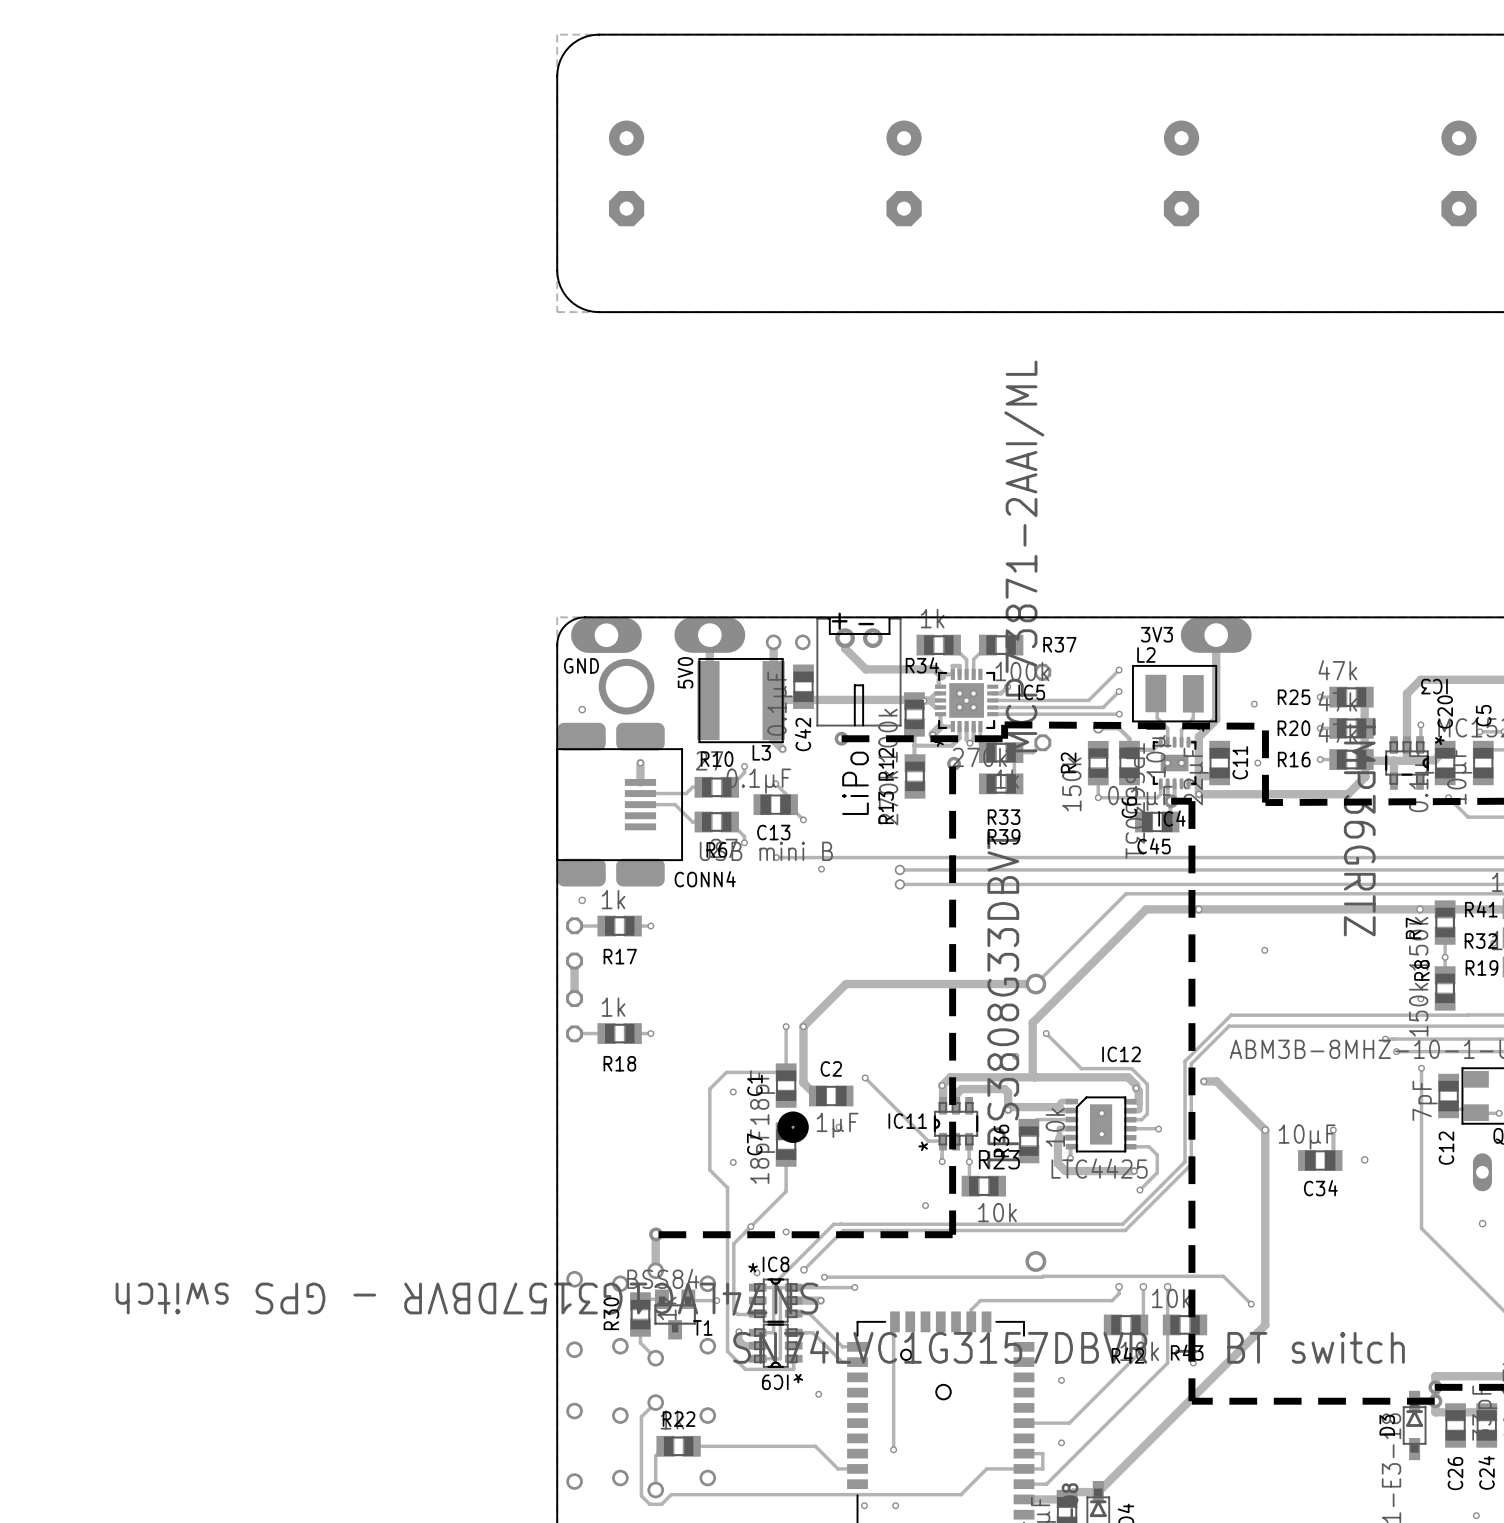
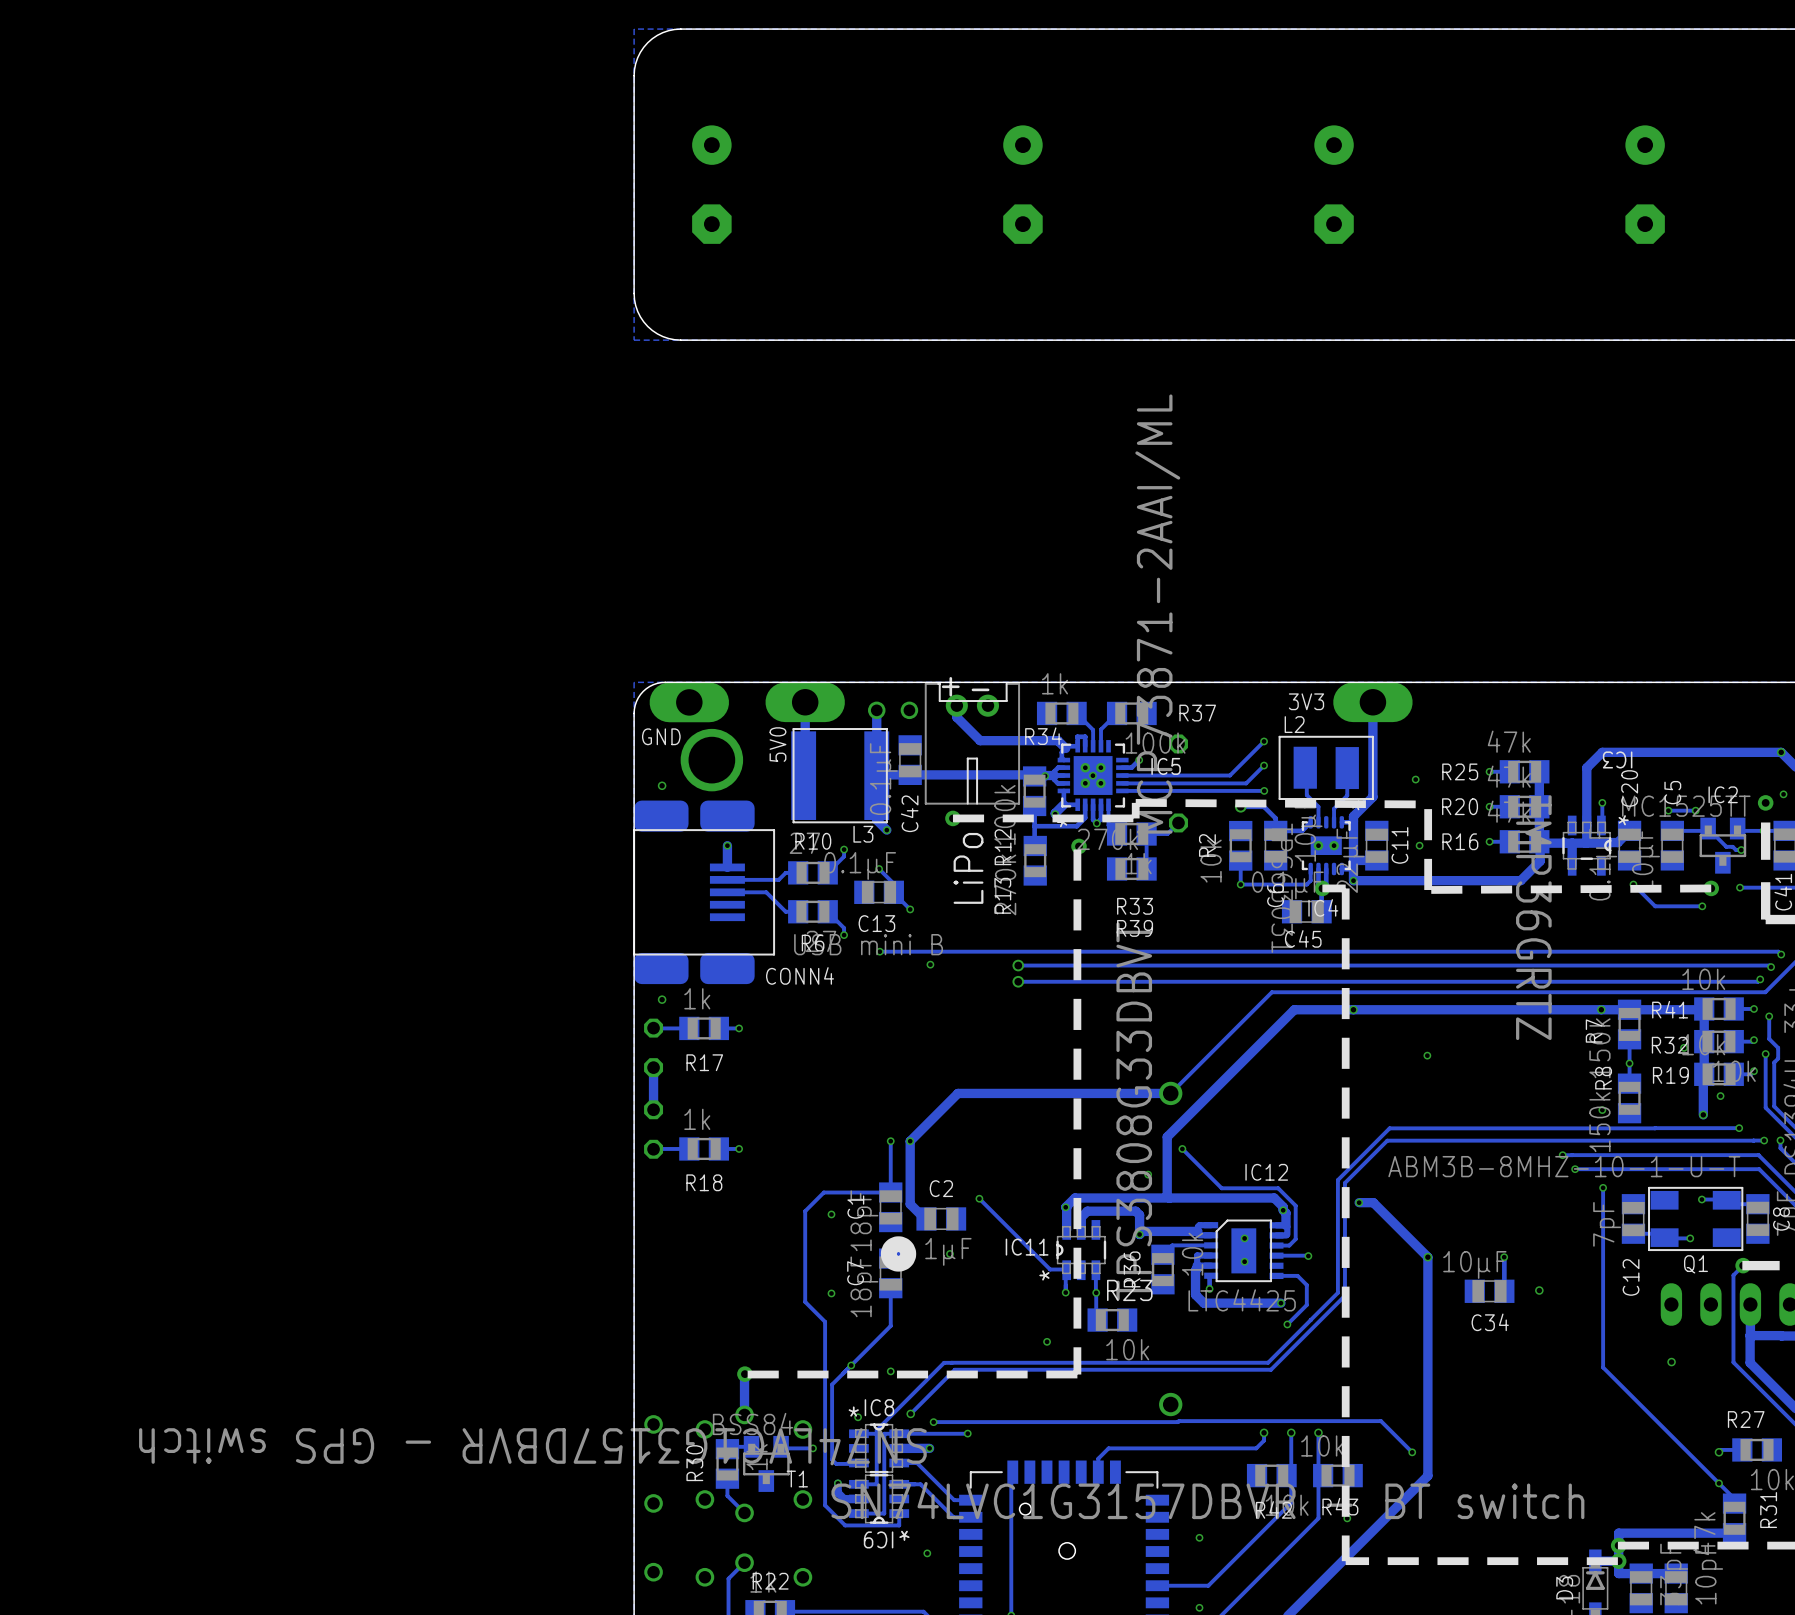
R2 value: 150k (1071, 784) -> 10k (1211, 861)

